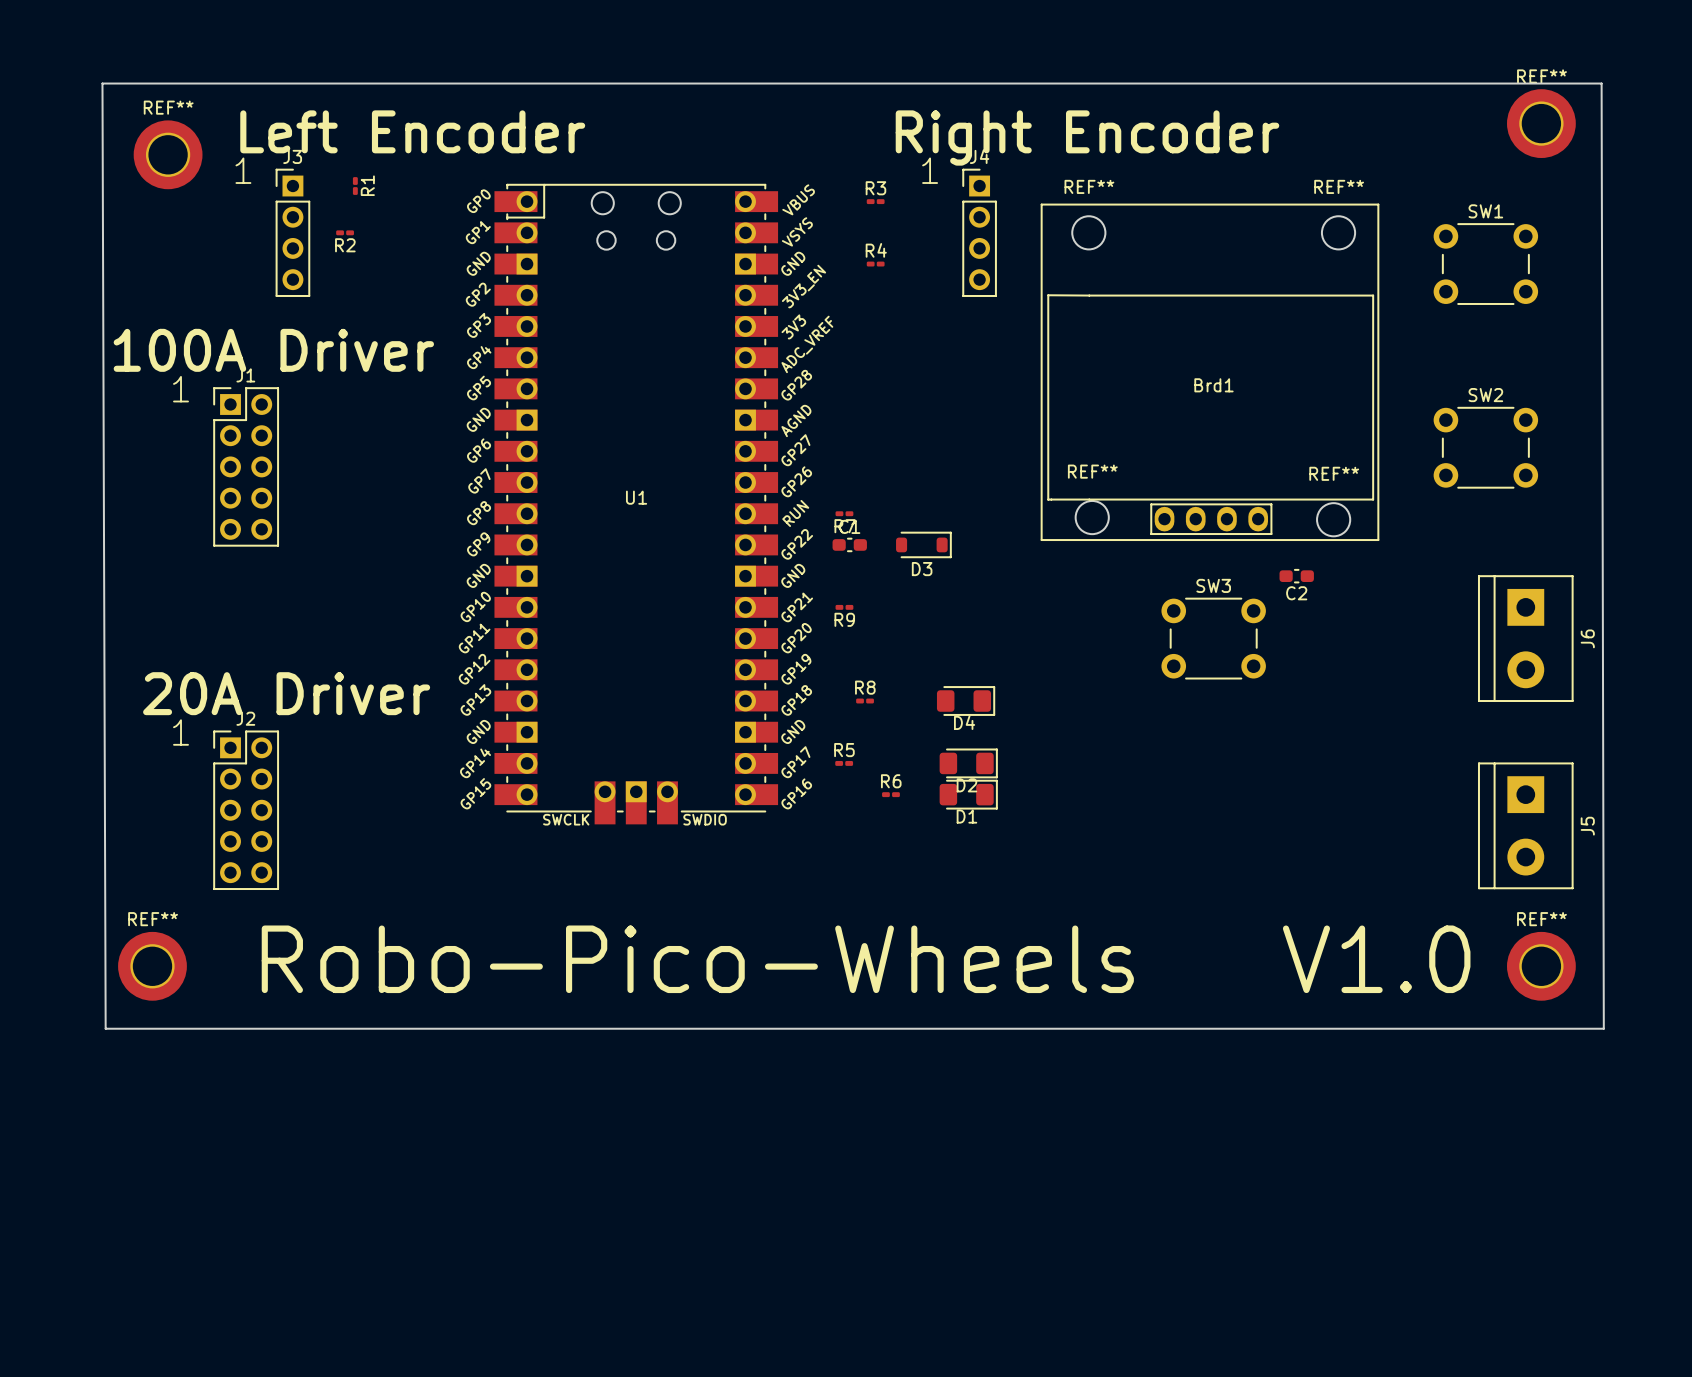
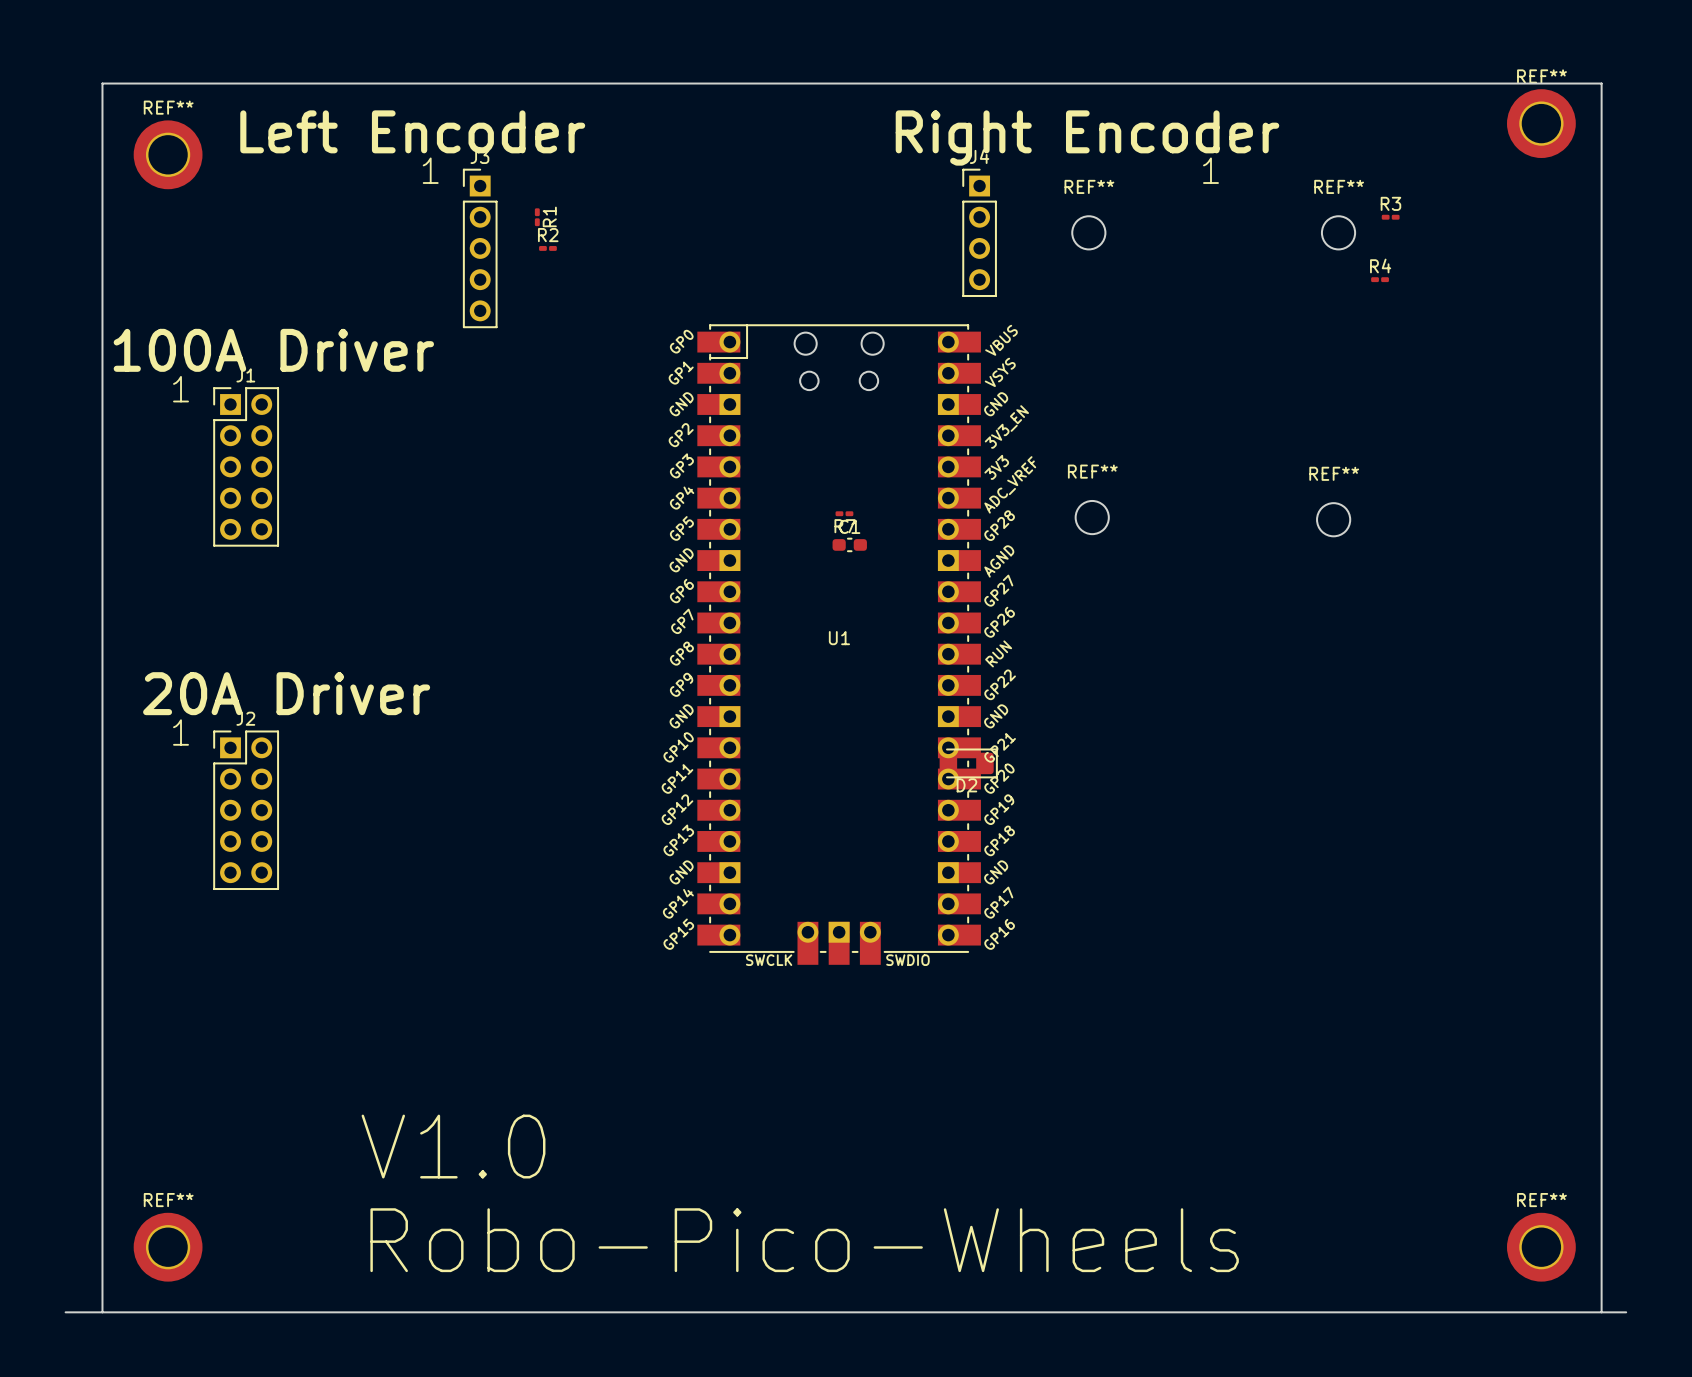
board edge: (102, 83) (105, 1028) (1603, 1028) (1601, 83) -> (102, 83) (102, 1312)
board edge: none -> (1601, 83) (1601, 1312)
J3 footprint: [275, 168, 311, 297] -> [463, 168, 498, 328]
text position: 1 (243, 170) -> 1 (430, 170)
text: 1 (930, 170) -> none
text: none -> 1 (1210, 170)
R1 position: (355, 186) -> (537, 217)
R3 position: (875, 201) -> (1390, 217)
R2 position: (345, 232) -> (547, 248)
R2 name position: R2 (345, 245) -> R2 (548, 235)
R4 position: (875, 264) -> (1380, 279)
SW1: (1485, 264) -> none
Brd1: (1209, 372) -> none
SW2: (1485, 447) -> none
U1 position: (636, 504) -> (839, 644)
D3: (923, 544) -> none
C2: (1296, 576) -> none
R9: (844, 607) -> none
SW3: (1213, 638) -> none
J6: (1525, 638) -> none
R8: (865, 701) -> none
D4: (965, 701) -> none
R5: (844, 763) -> none
R6: (890, 794) -> none
D1: (968, 794) -> none
J5: (1525, 825) -> none
text position: Robo-Pico-Wheels (697, 959) -> Robo-Pico-Wheels (804, 1240)
text: V1.0 (1376, 959) -> none
REF** position: (152, 966) -> (168, 1247)
REF** position: (1541, 966) -> (1541, 1247)
text: none -> V1.0 (453, 1146)
board edge: none -> (65, 1312) (1626, 1312)

